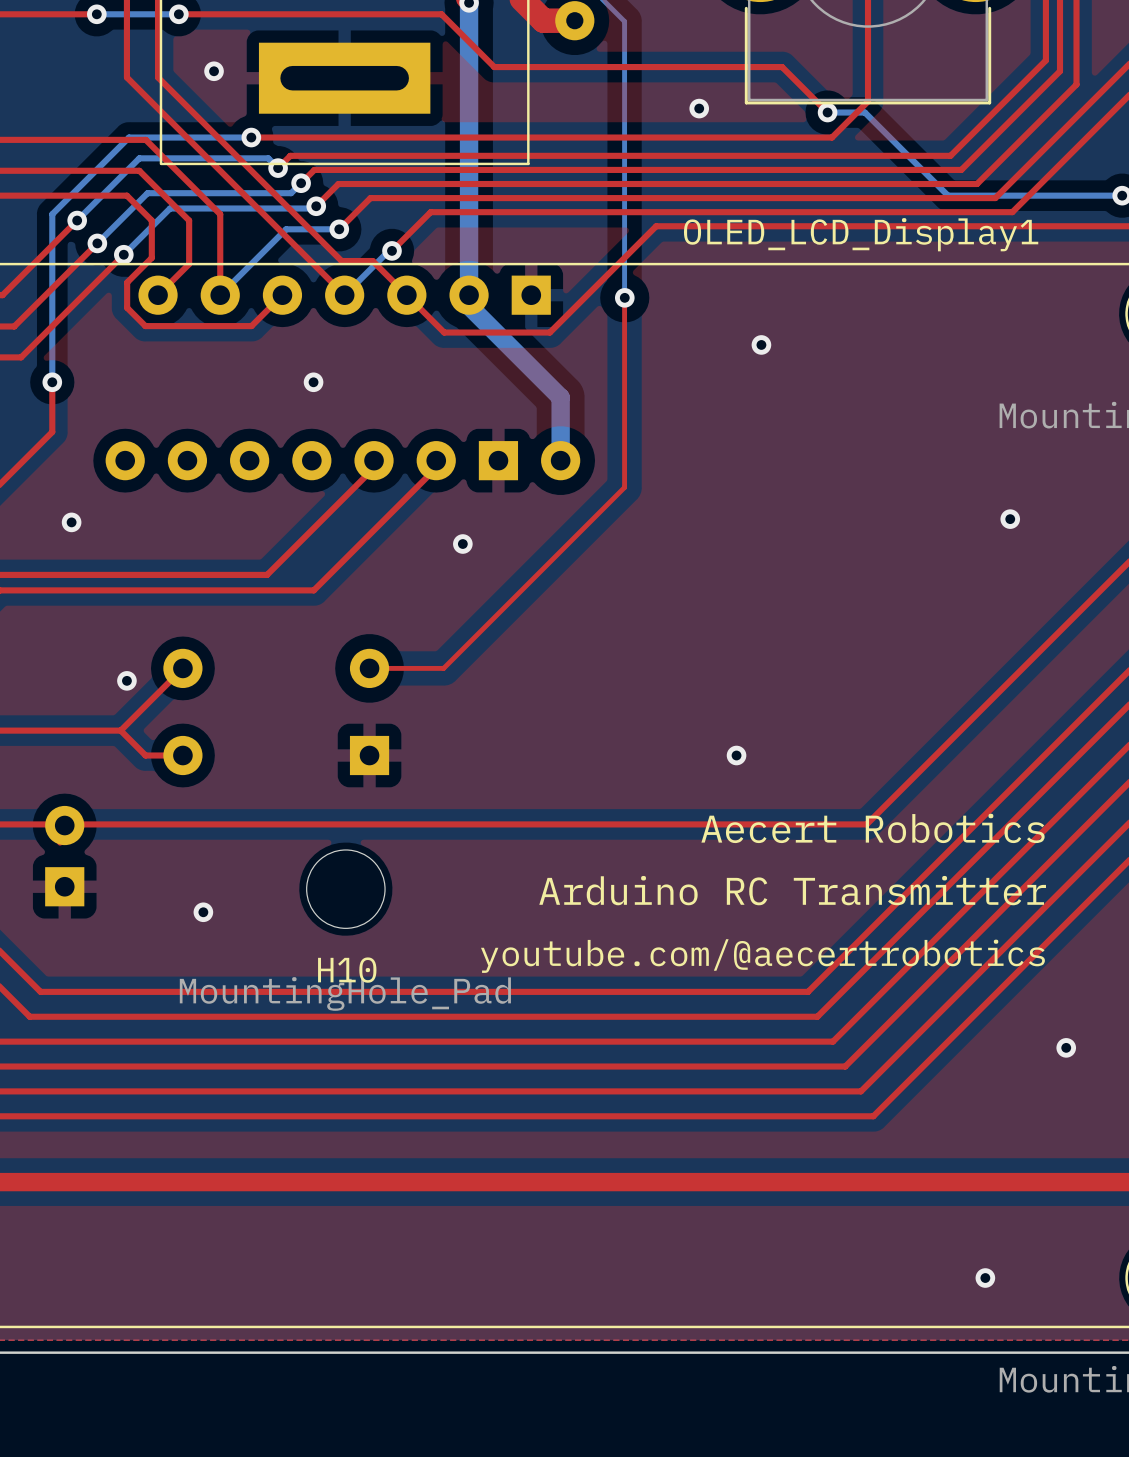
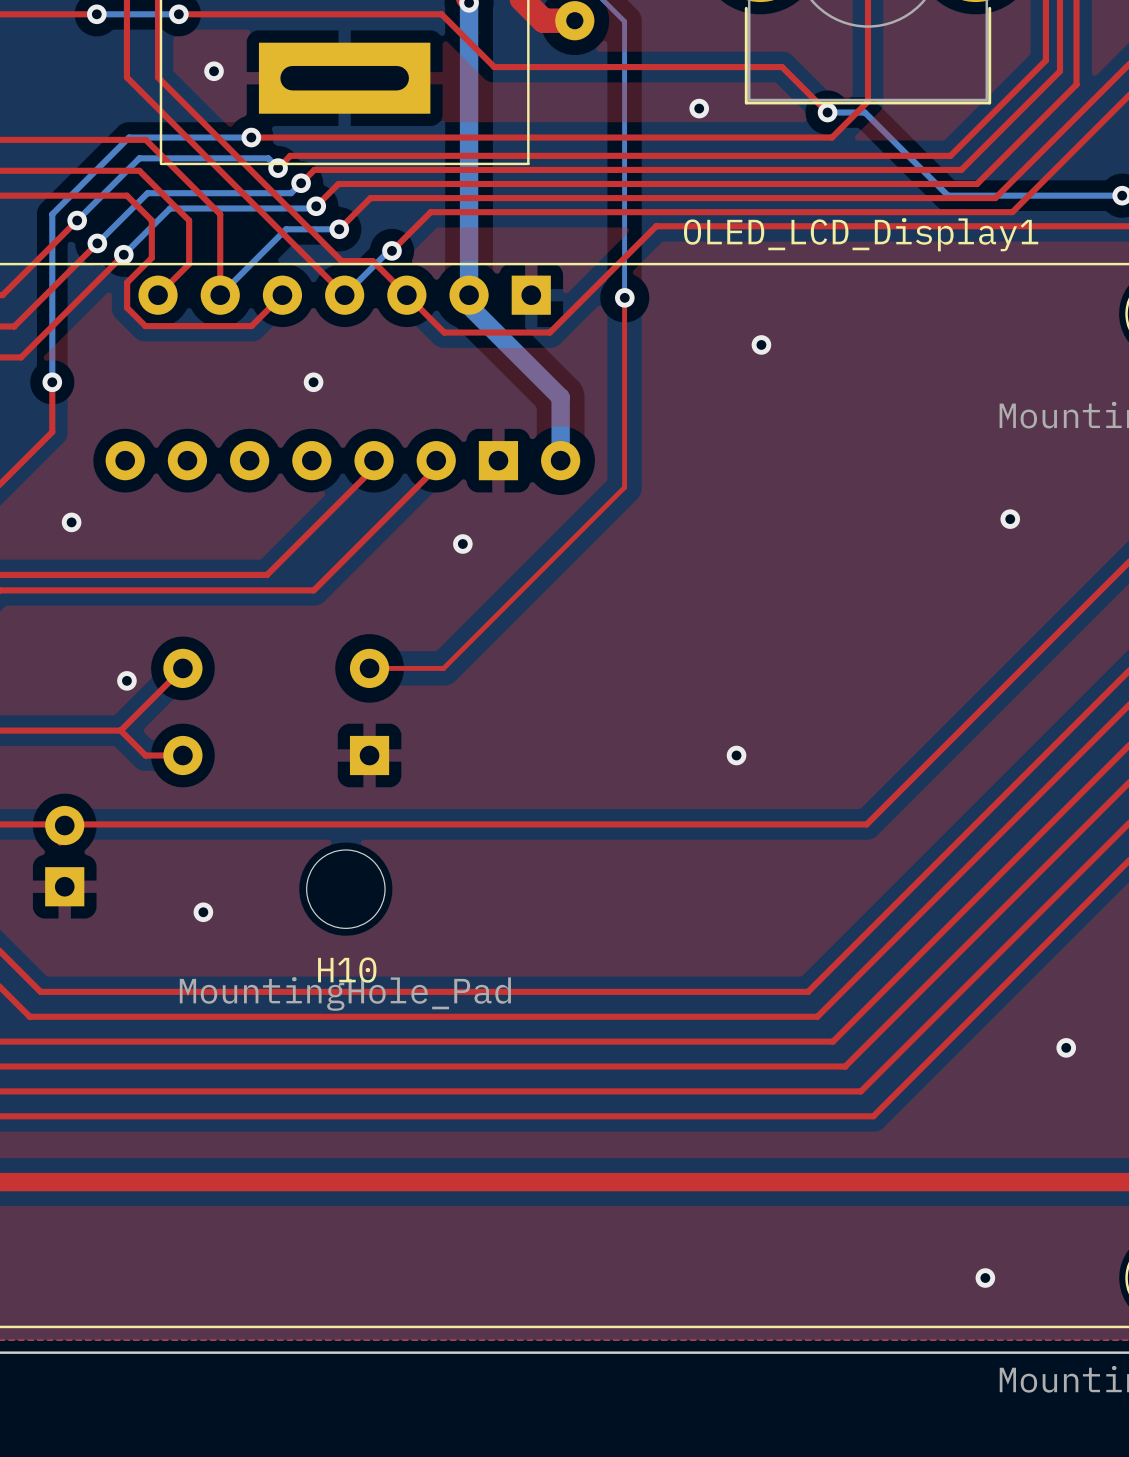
text: Aecert Robotics (873, 828) -> none
text: Arduino RC Transmitter (792, 890) -> none
text: youtube.com/@aecertrobotics (762, 956) -> none

